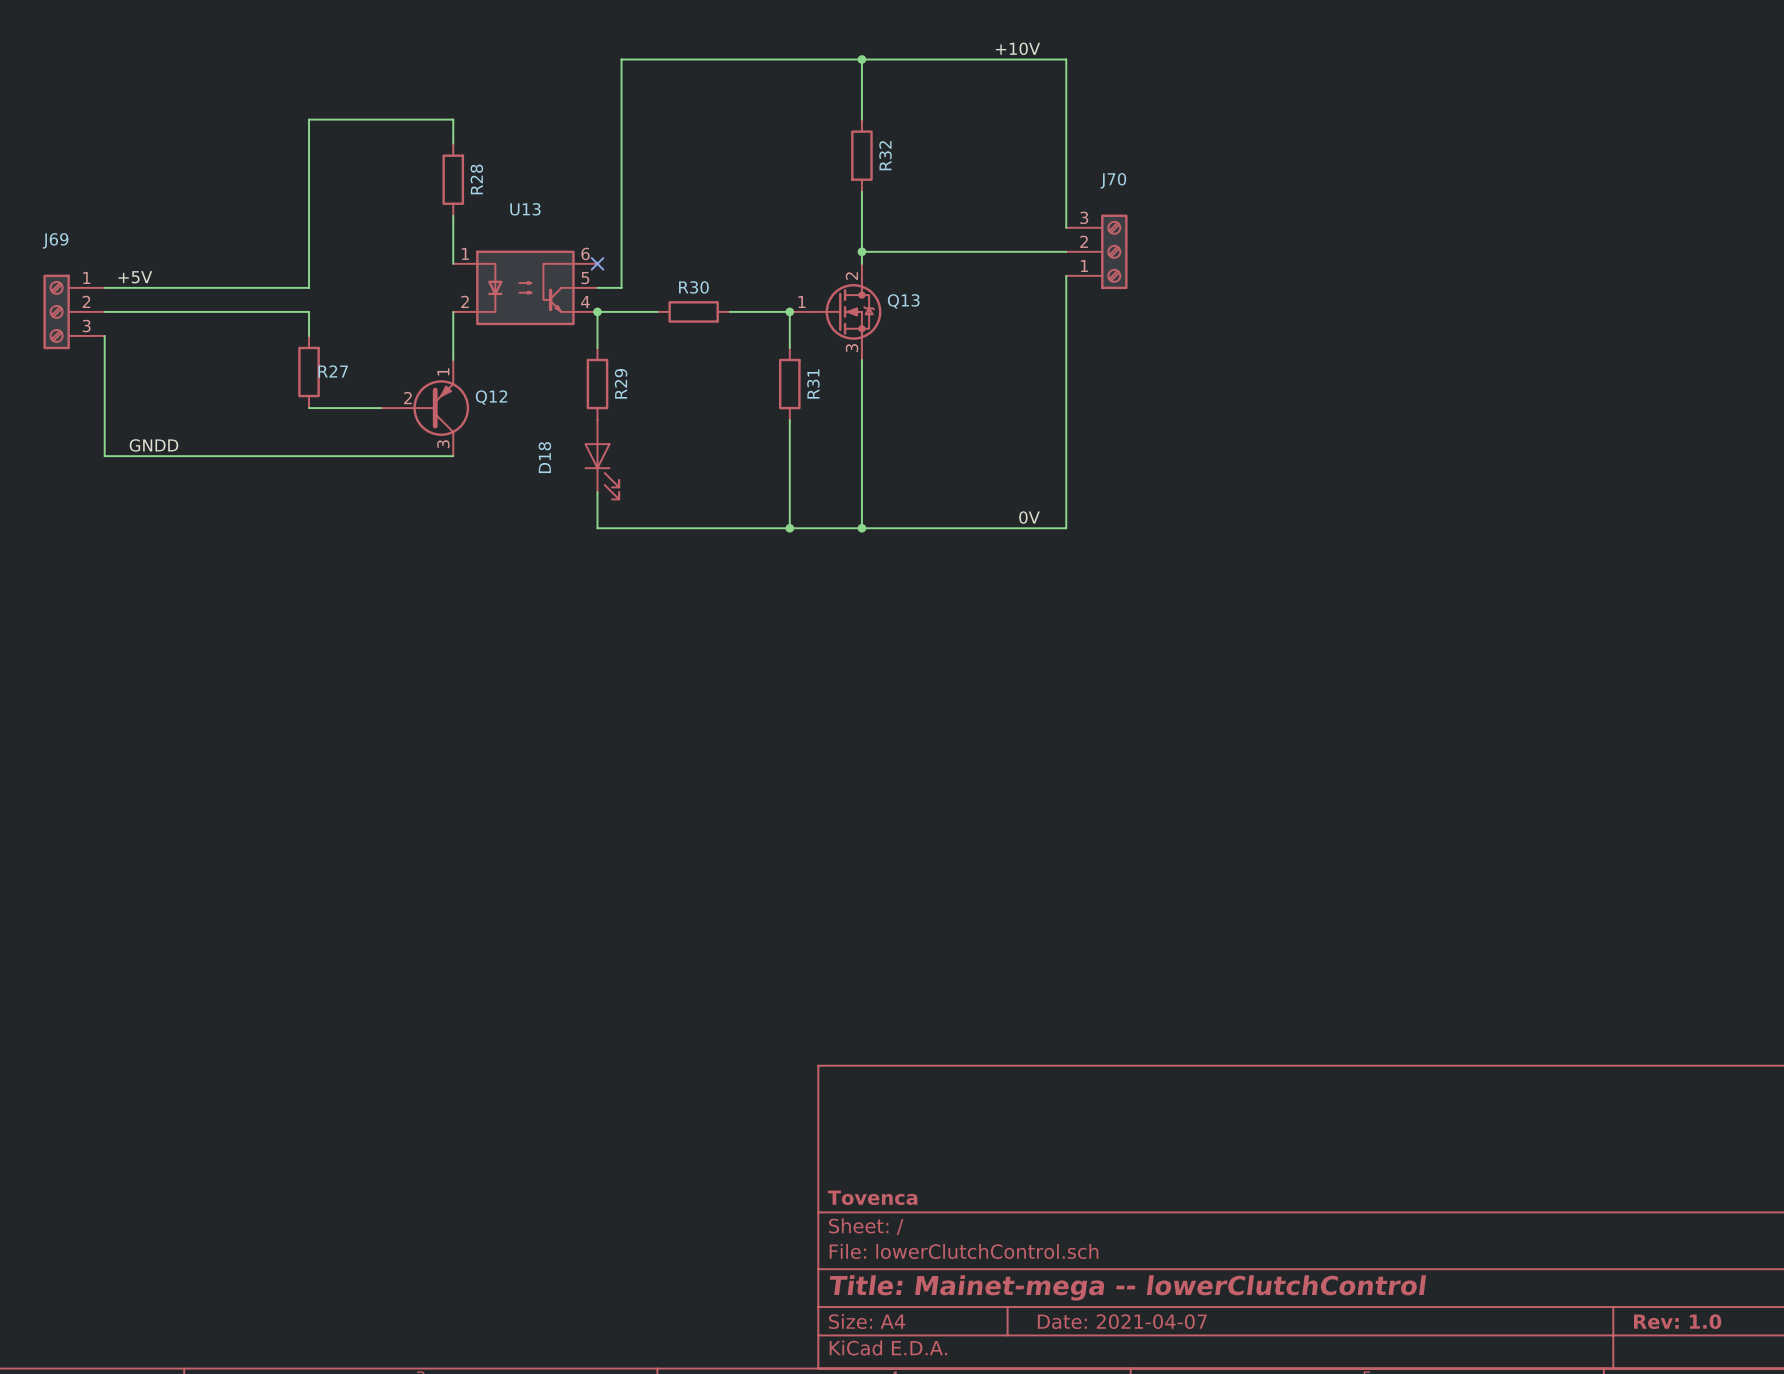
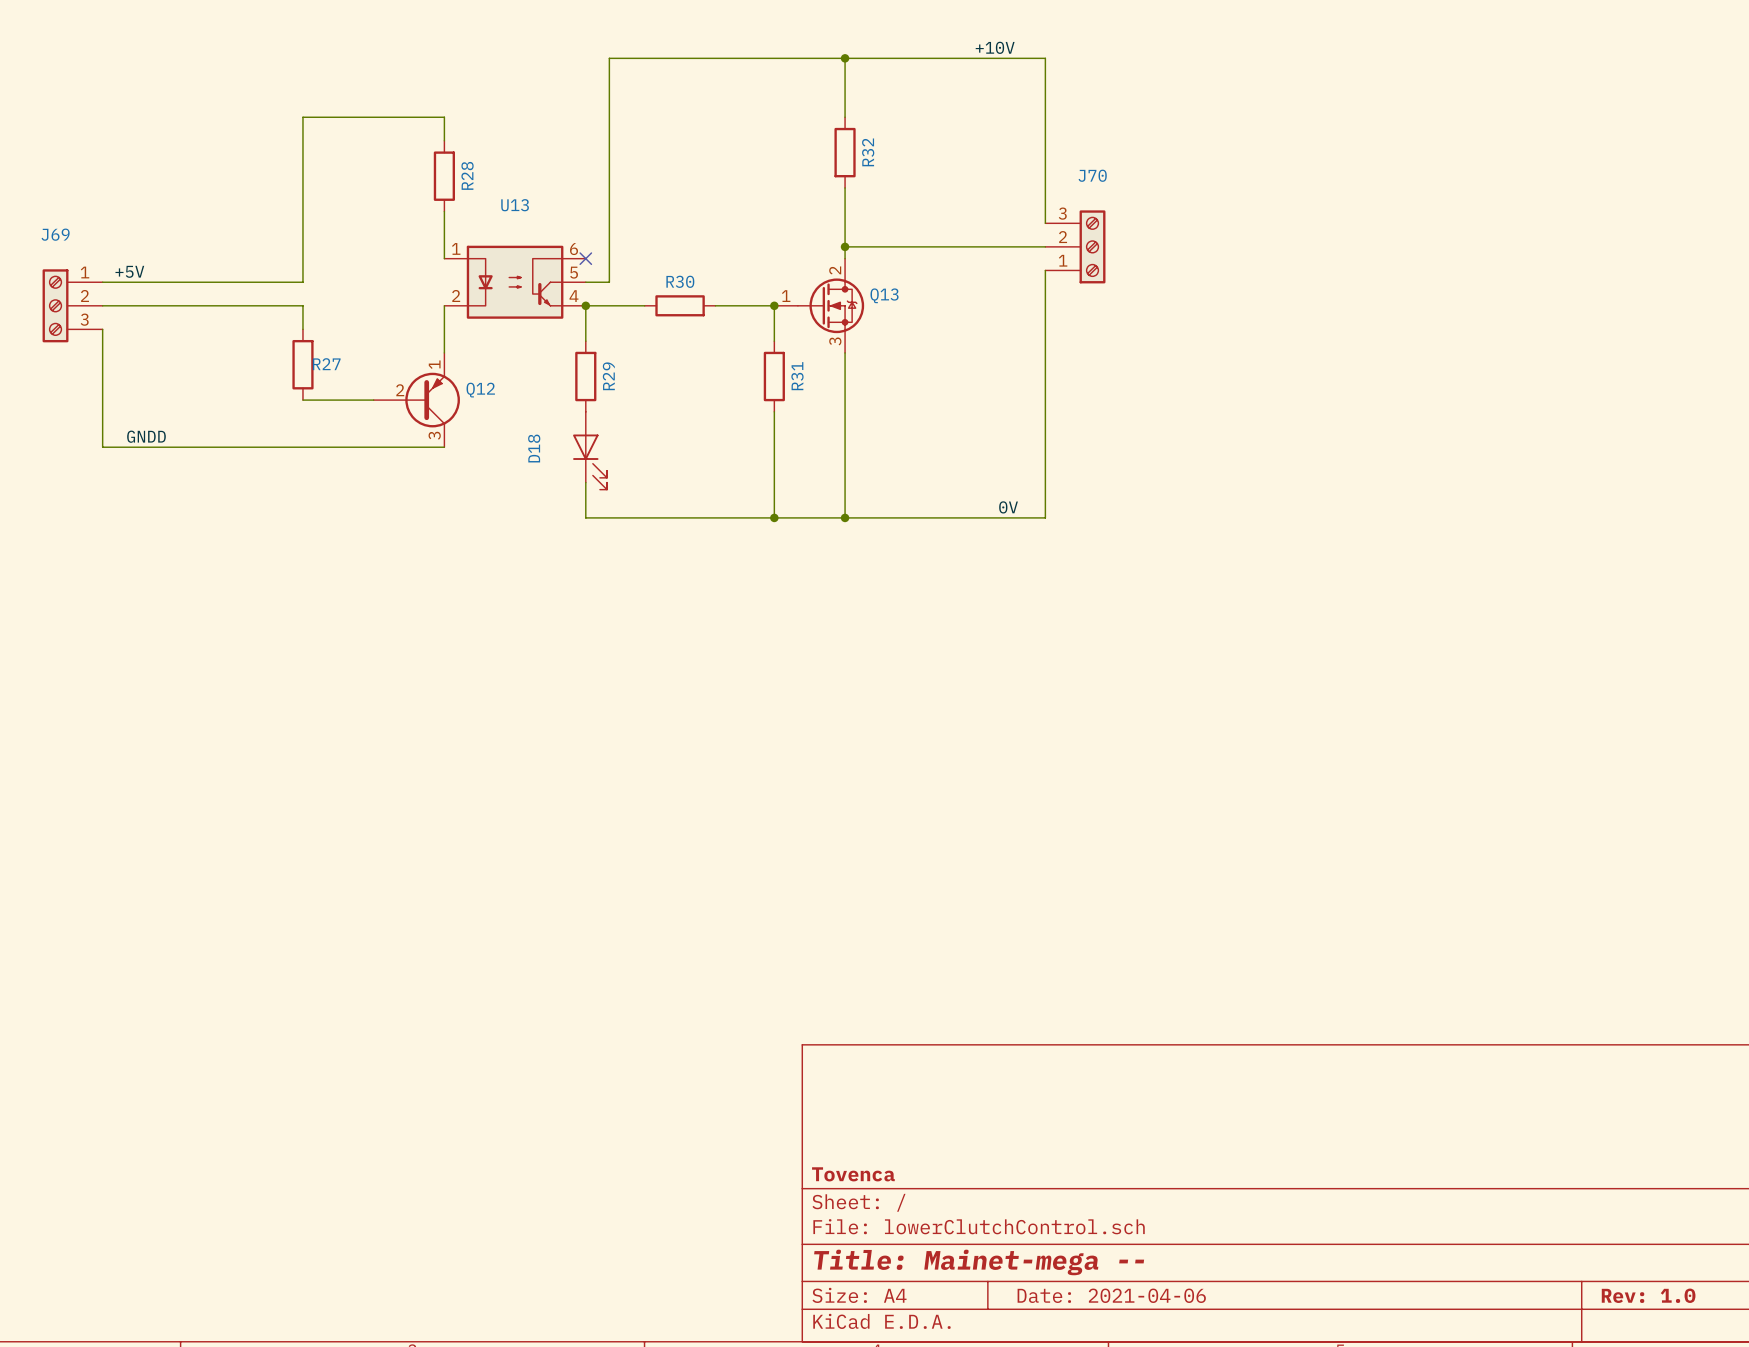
title block: Title: Mainet-mega -- lowerClutchControl (1127, 1287) -> Title: Mainet-mega -- (979, 1262)
title block: Date: 2021-04-07 (1122, 1321) -> Date: 2021-04-06 (1111, 1295)

